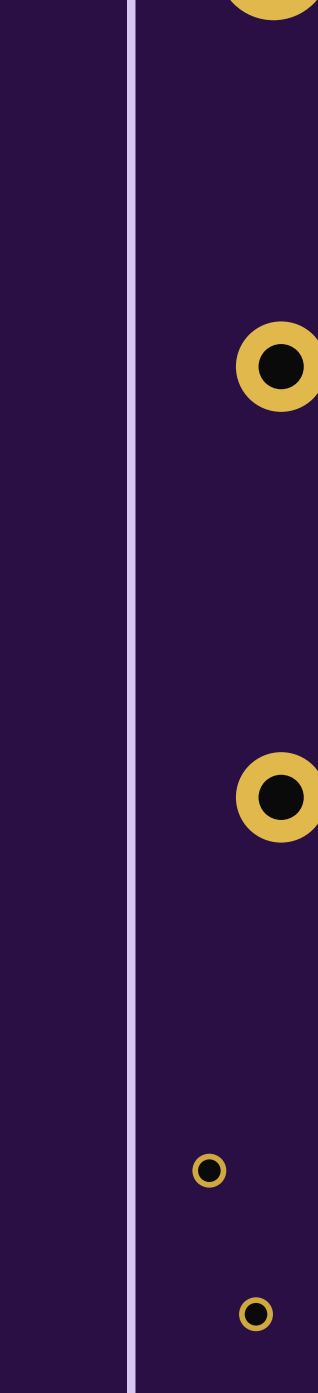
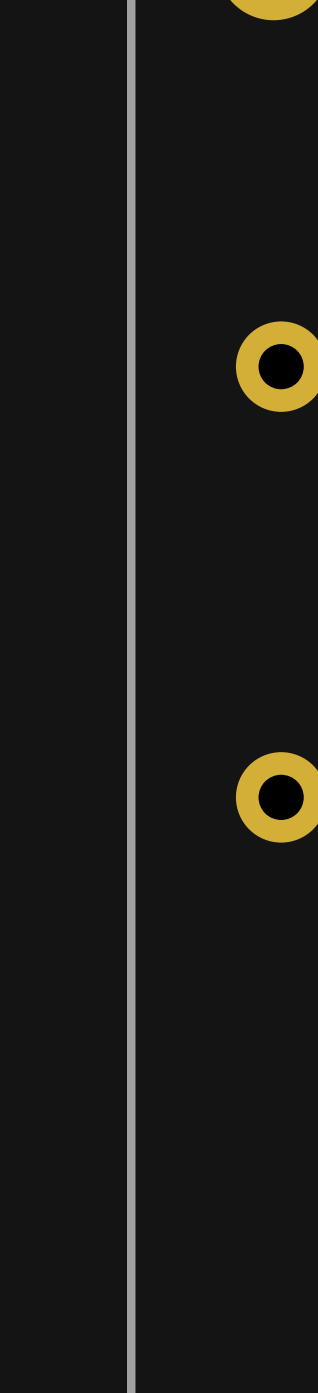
via: (209, 1170) -> none
via: (256, 1314) -> none

